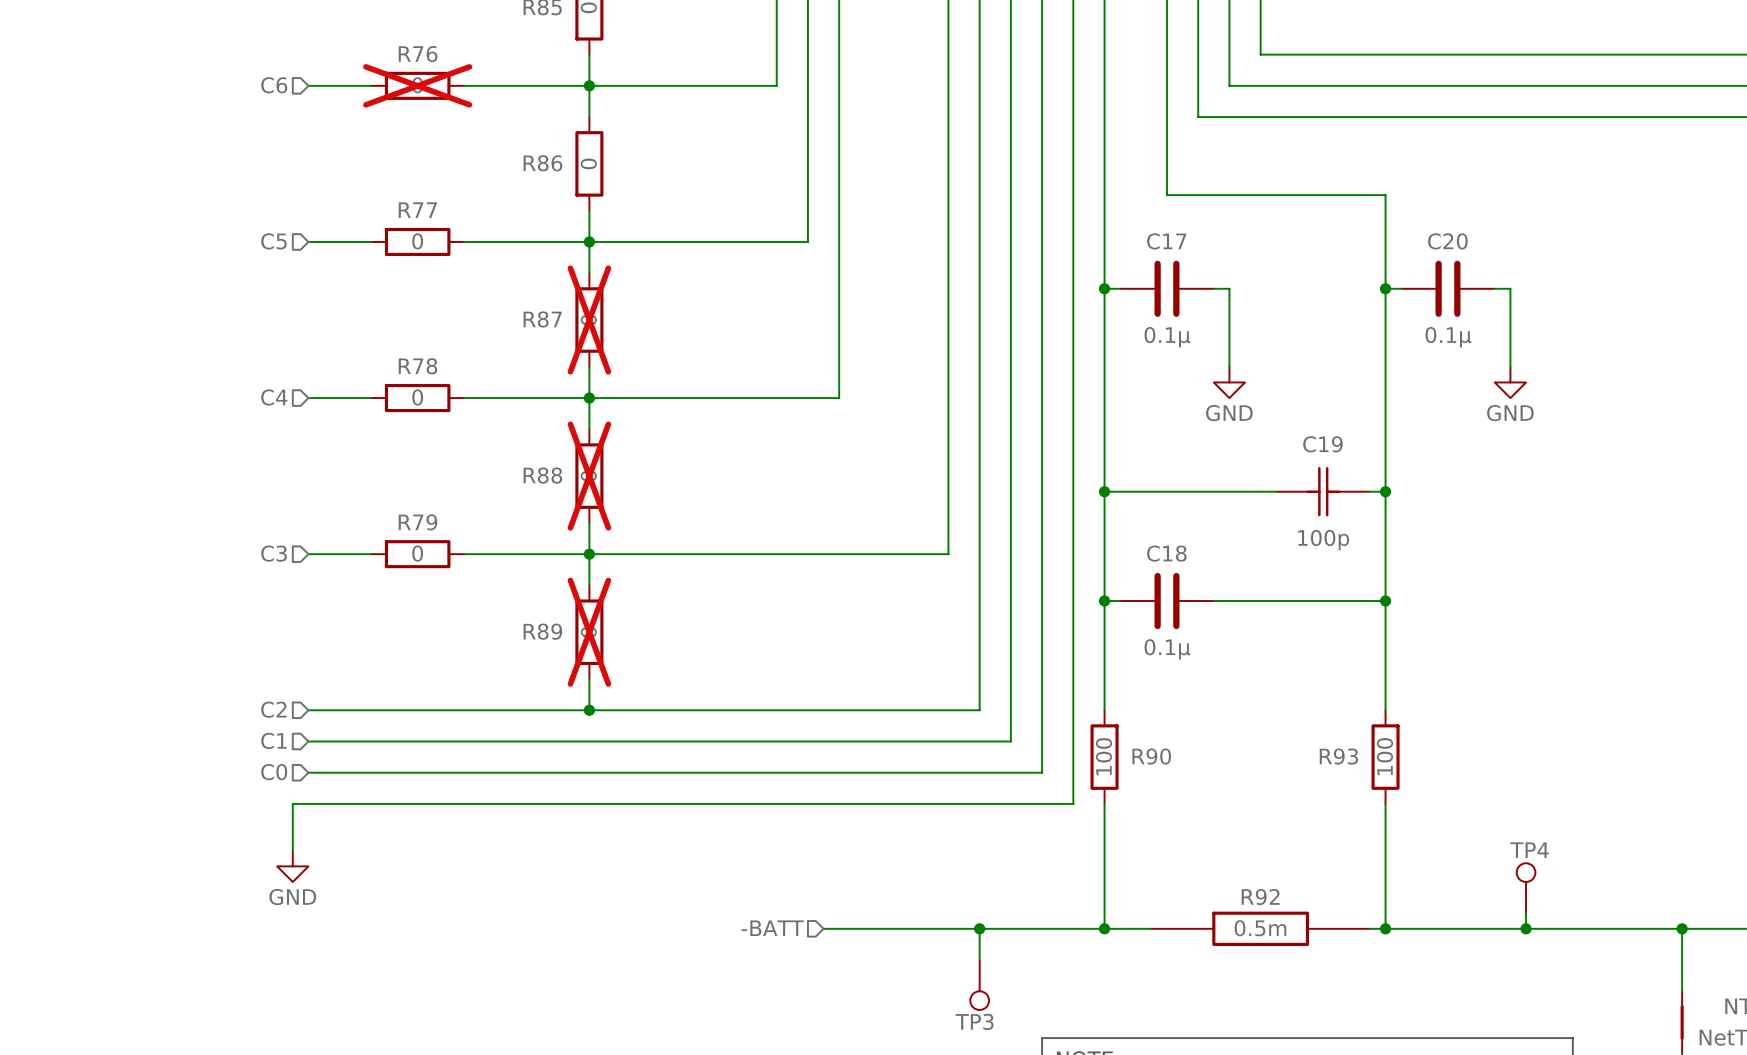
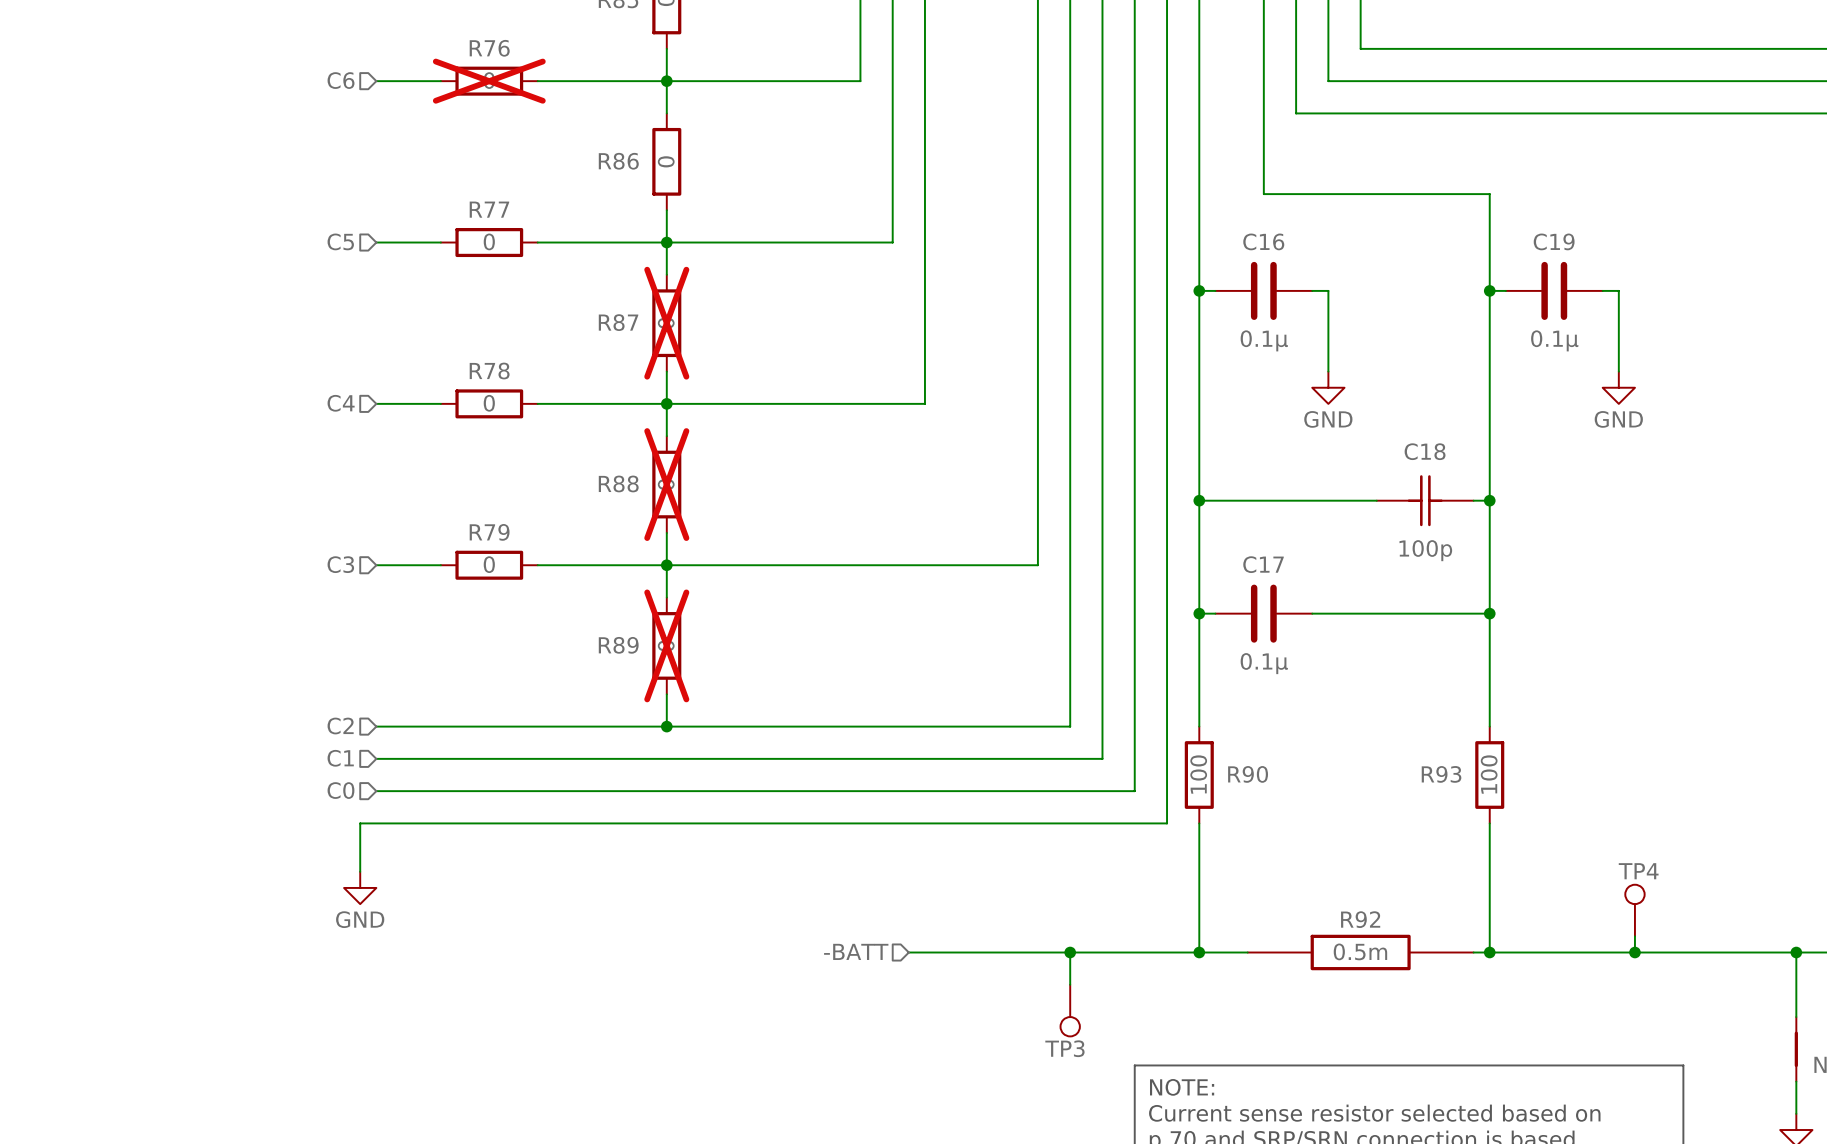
C17 name: C17 (1166, 241) -> C16 (1263, 241)
C20 name: C20 (1447, 241) -> C19 (1554, 241)
C19 name: C19 (1322, 444) -> C18 (1425, 451)
C18 name: C18 (1166, 553) -> C17 (1263, 564)

